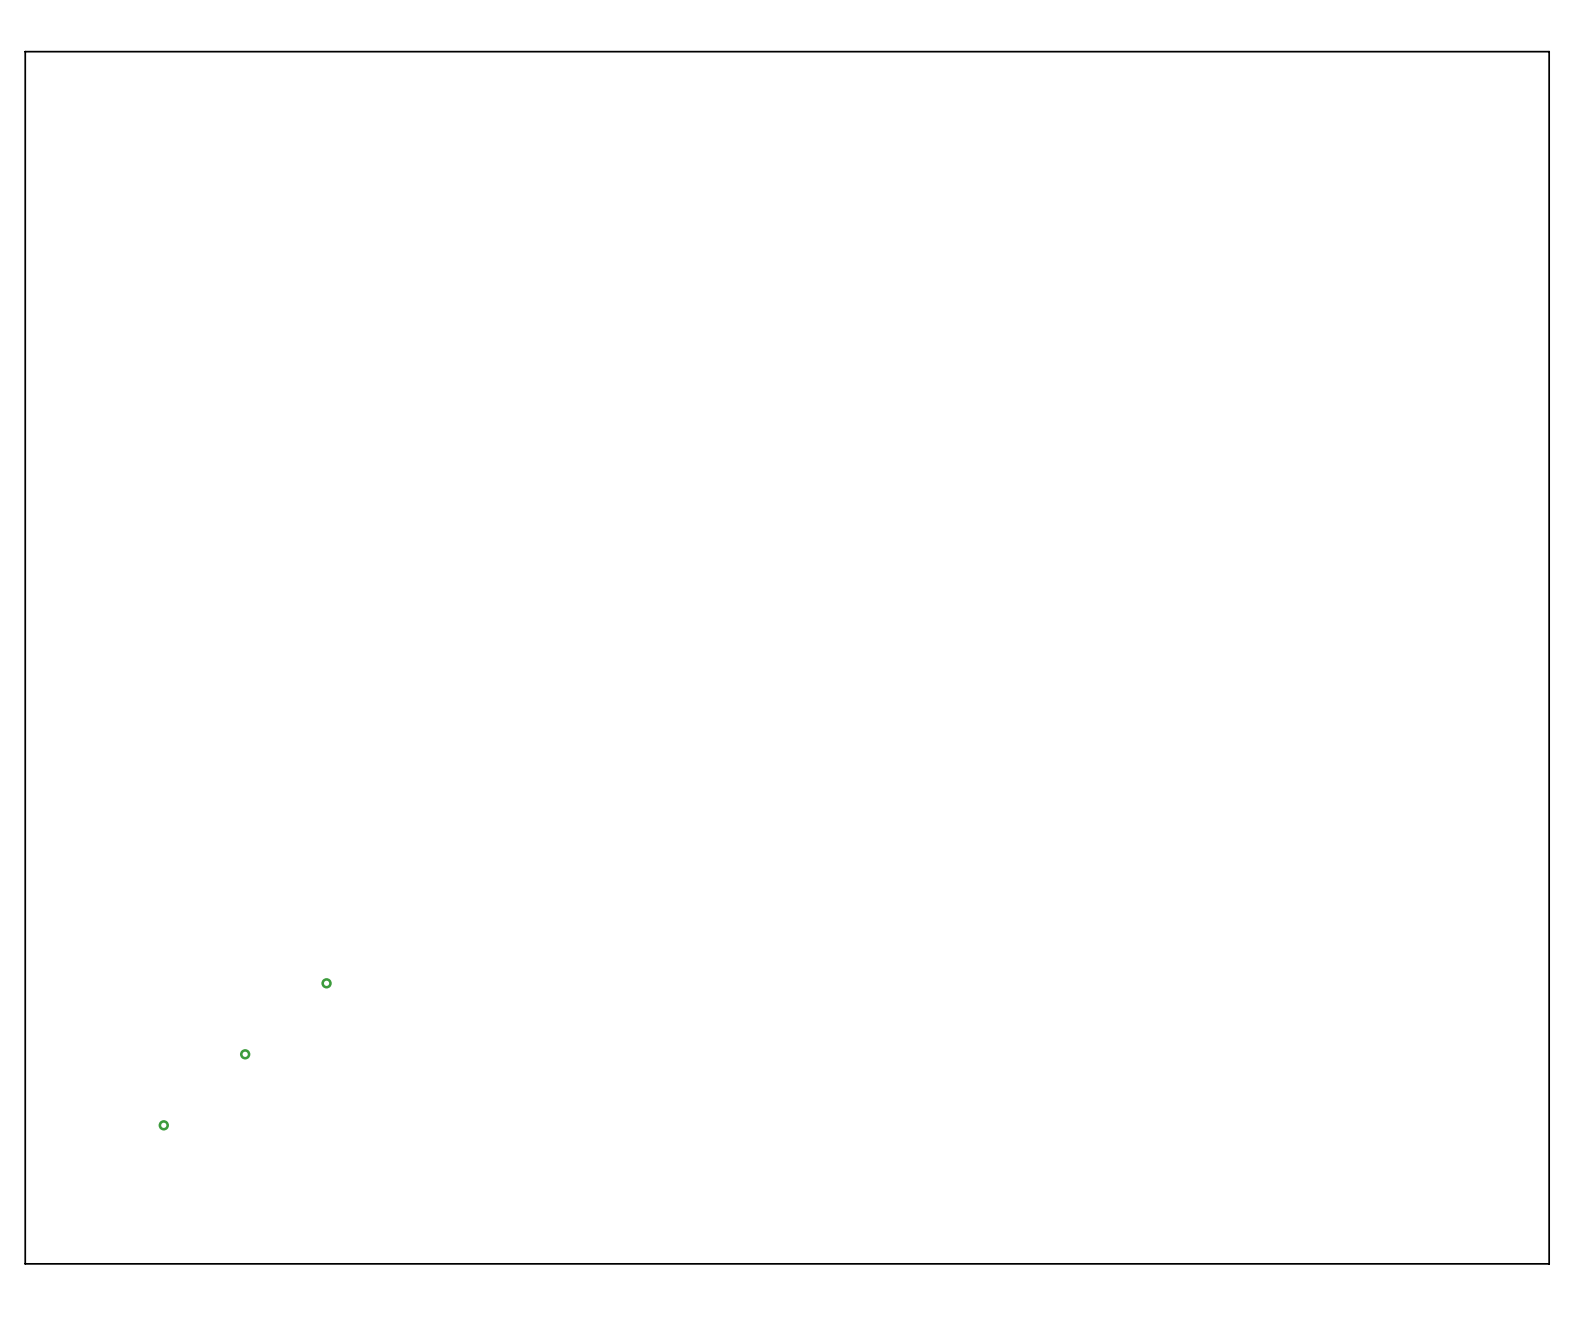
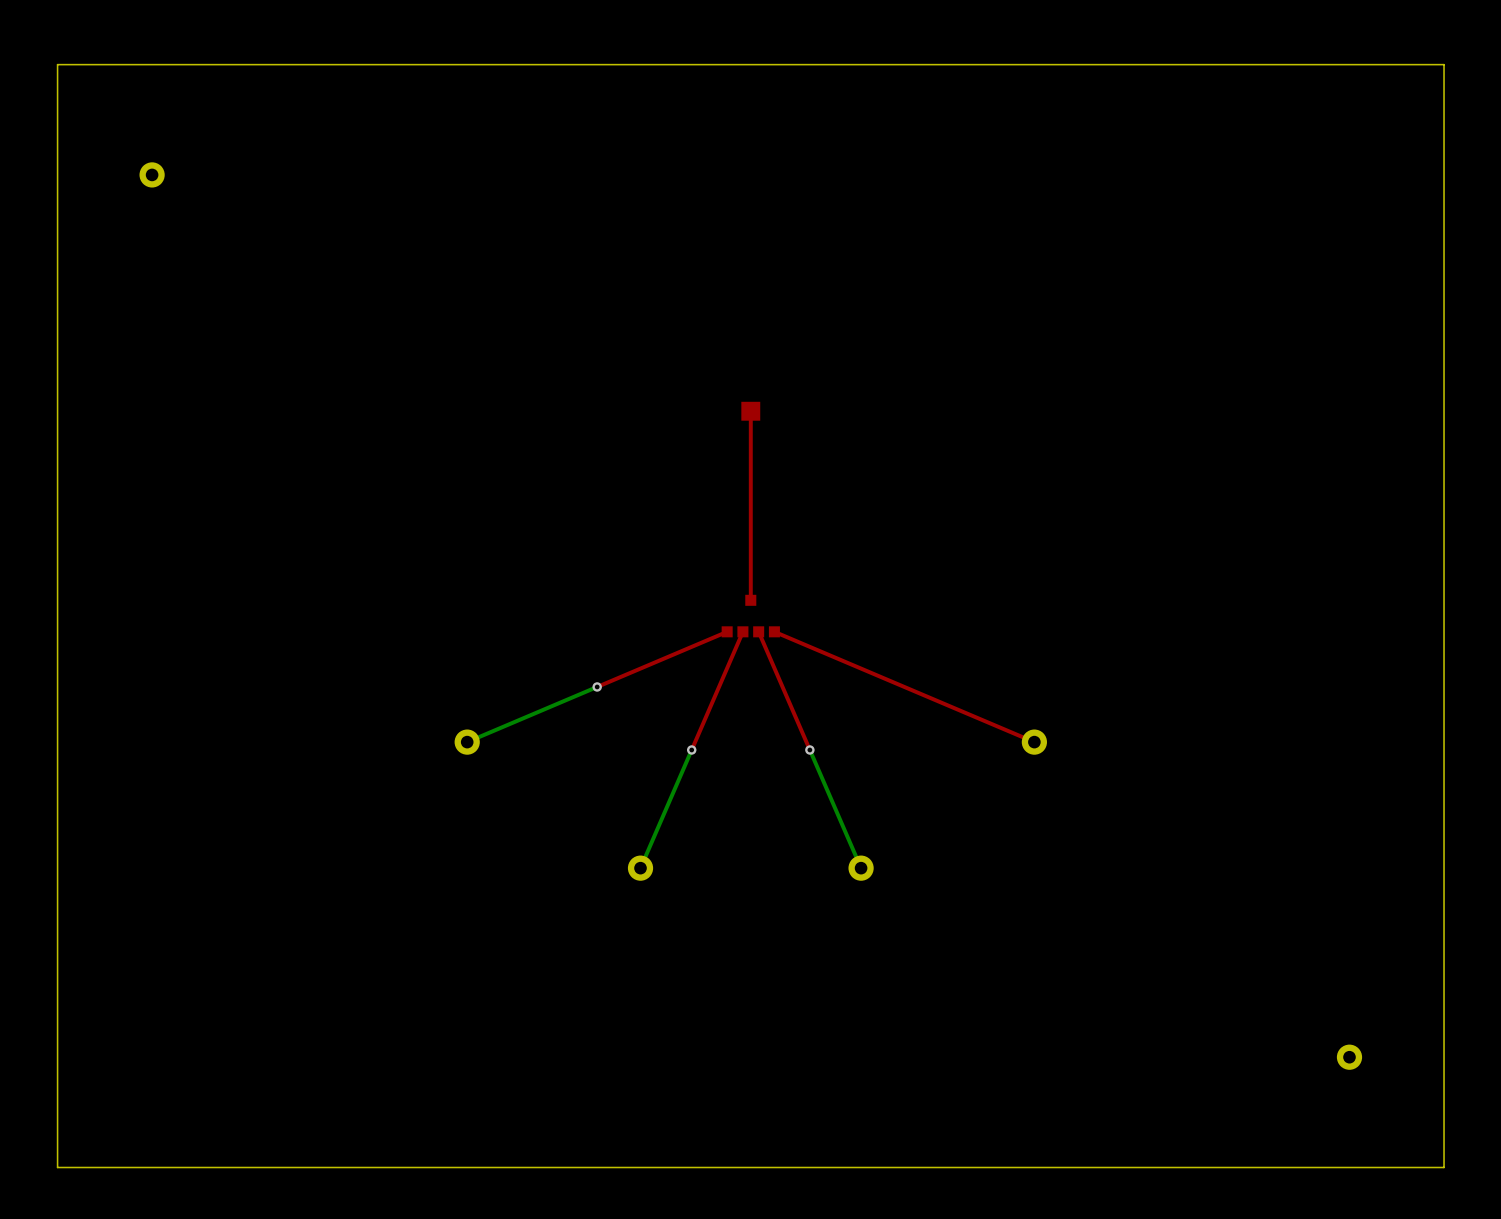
part: none -> (152, 174)
top track: none -> (750, 411) (750, 600)
part: none -> (750, 411)
part: none -> (750, 616)
top track: none -> (727, 631) (597, 686)
top track: none -> (742, 631) (691, 749)
top track: none -> (758, 631) (809, 749)
top track: none -> (774, 631) (1034, 742)
bottom track: none -> (597, 686) (467, 742)
via: none -> (597, 686)
part: none -> (467, 742)
part: none -> (1034, 742)
bottom track: none -> (691, 749) (640, 868)
via: none -> (691, 749)
bottom track: none -> (809, 749) (861, 868)
via: none -> (809, 749)
part: none -> (640, 868)
part: none -> (861, 868)
via: (326, 983) -> none
via: (245, 1054) -> none
via: (163, 1125) -> none
part: none -> (1349, 1057)

